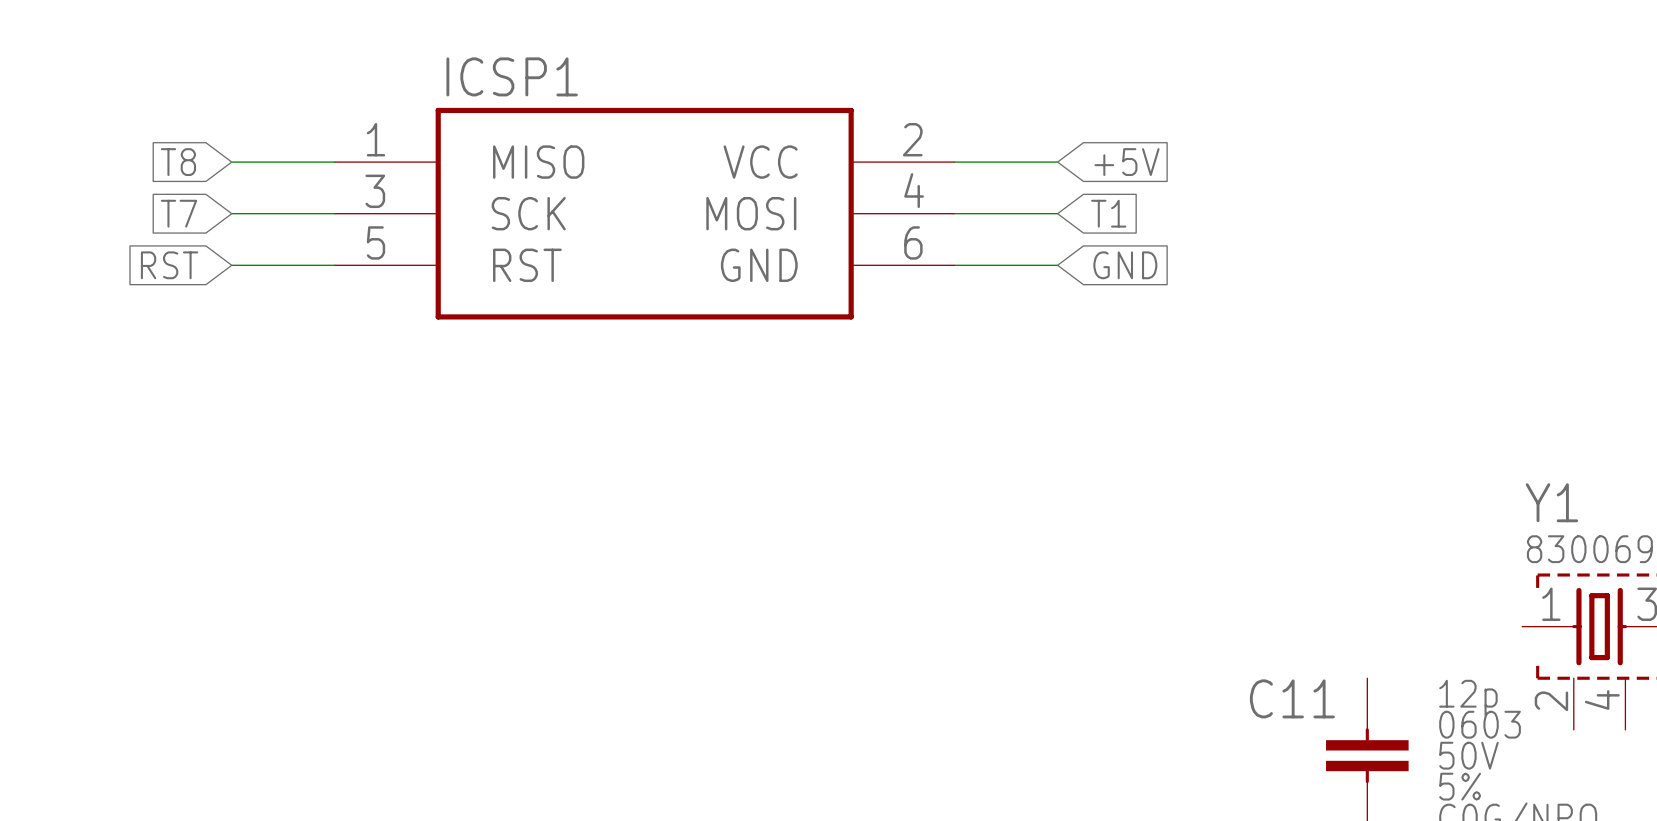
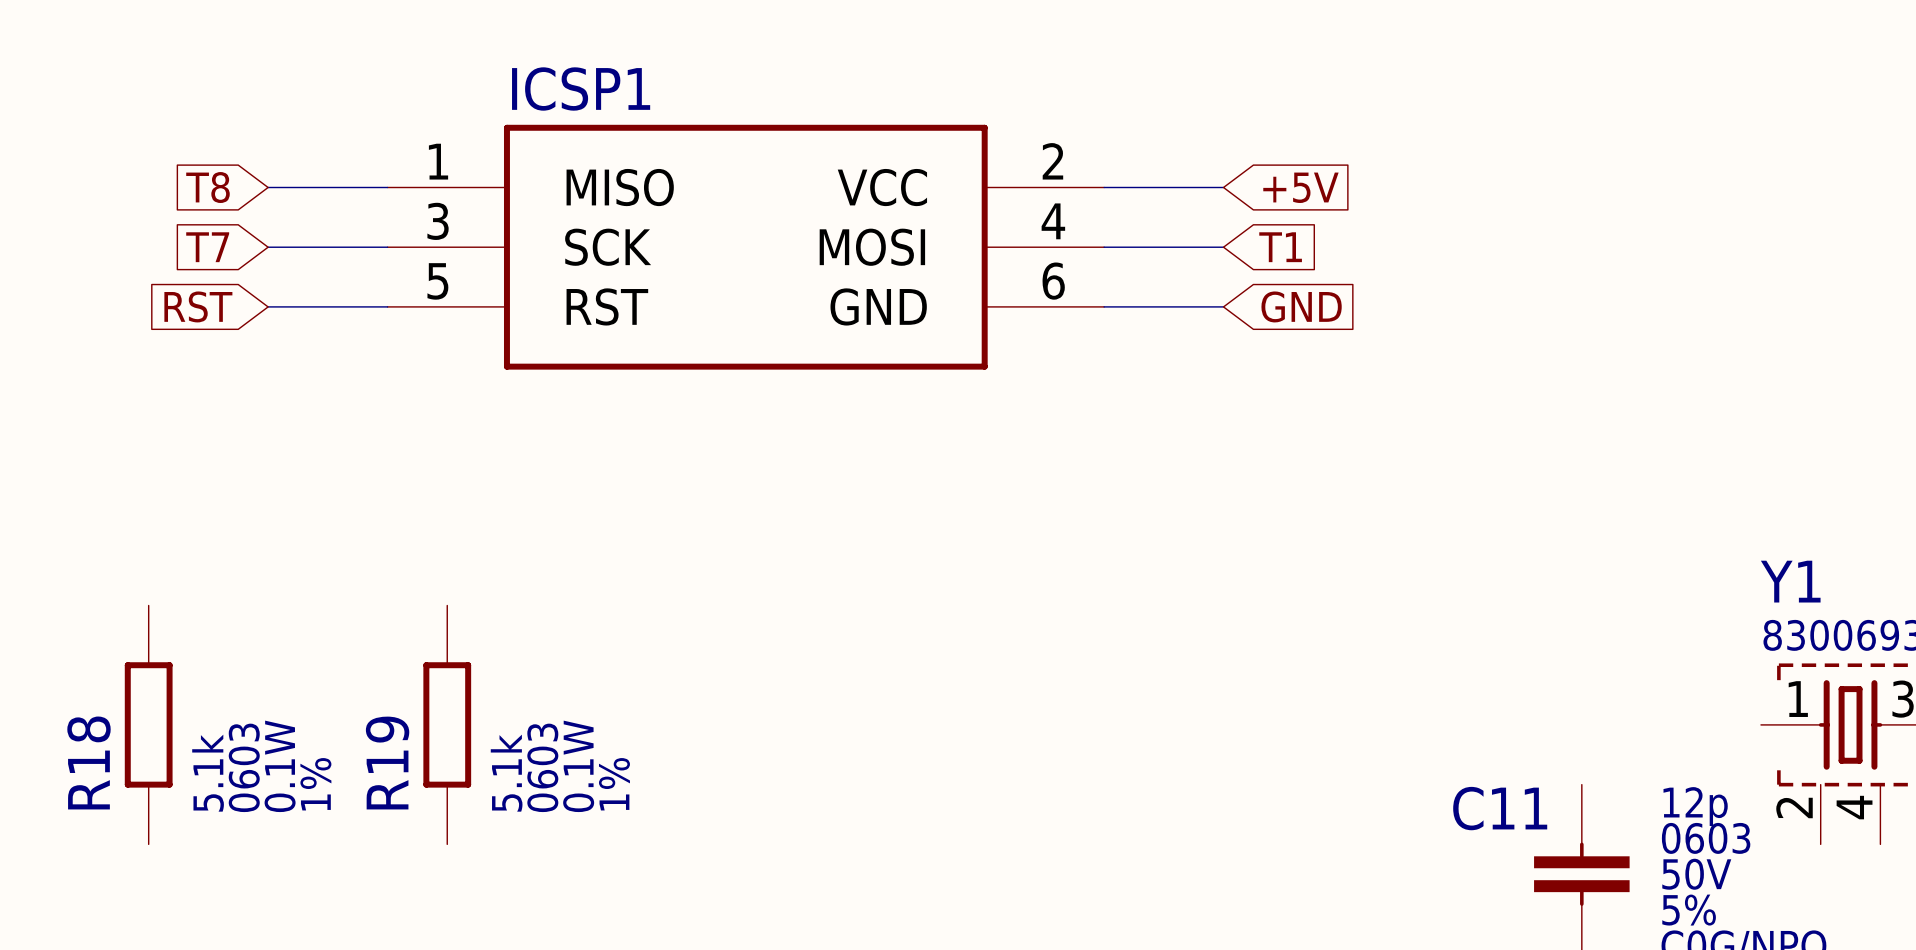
R18: none -> 5.1k (148, 724)
R19: none -> 5.1k (447, 724)

